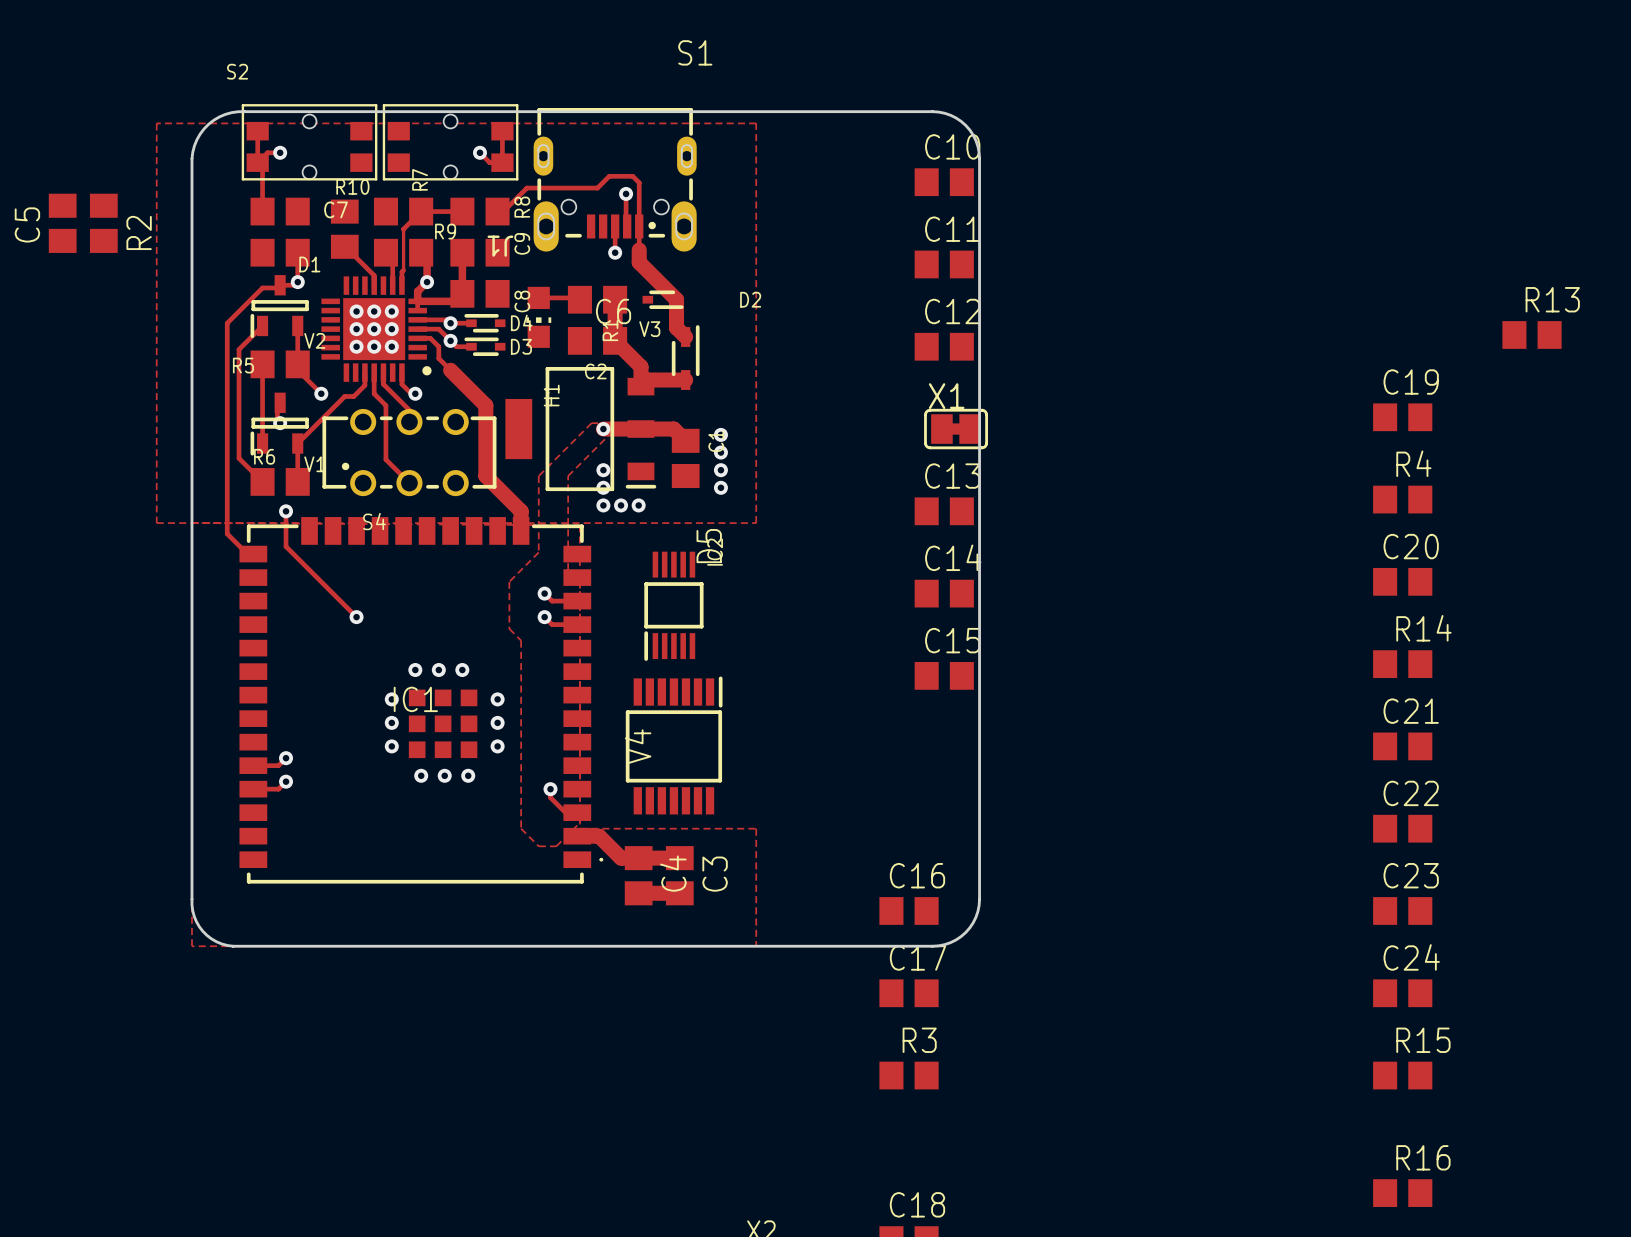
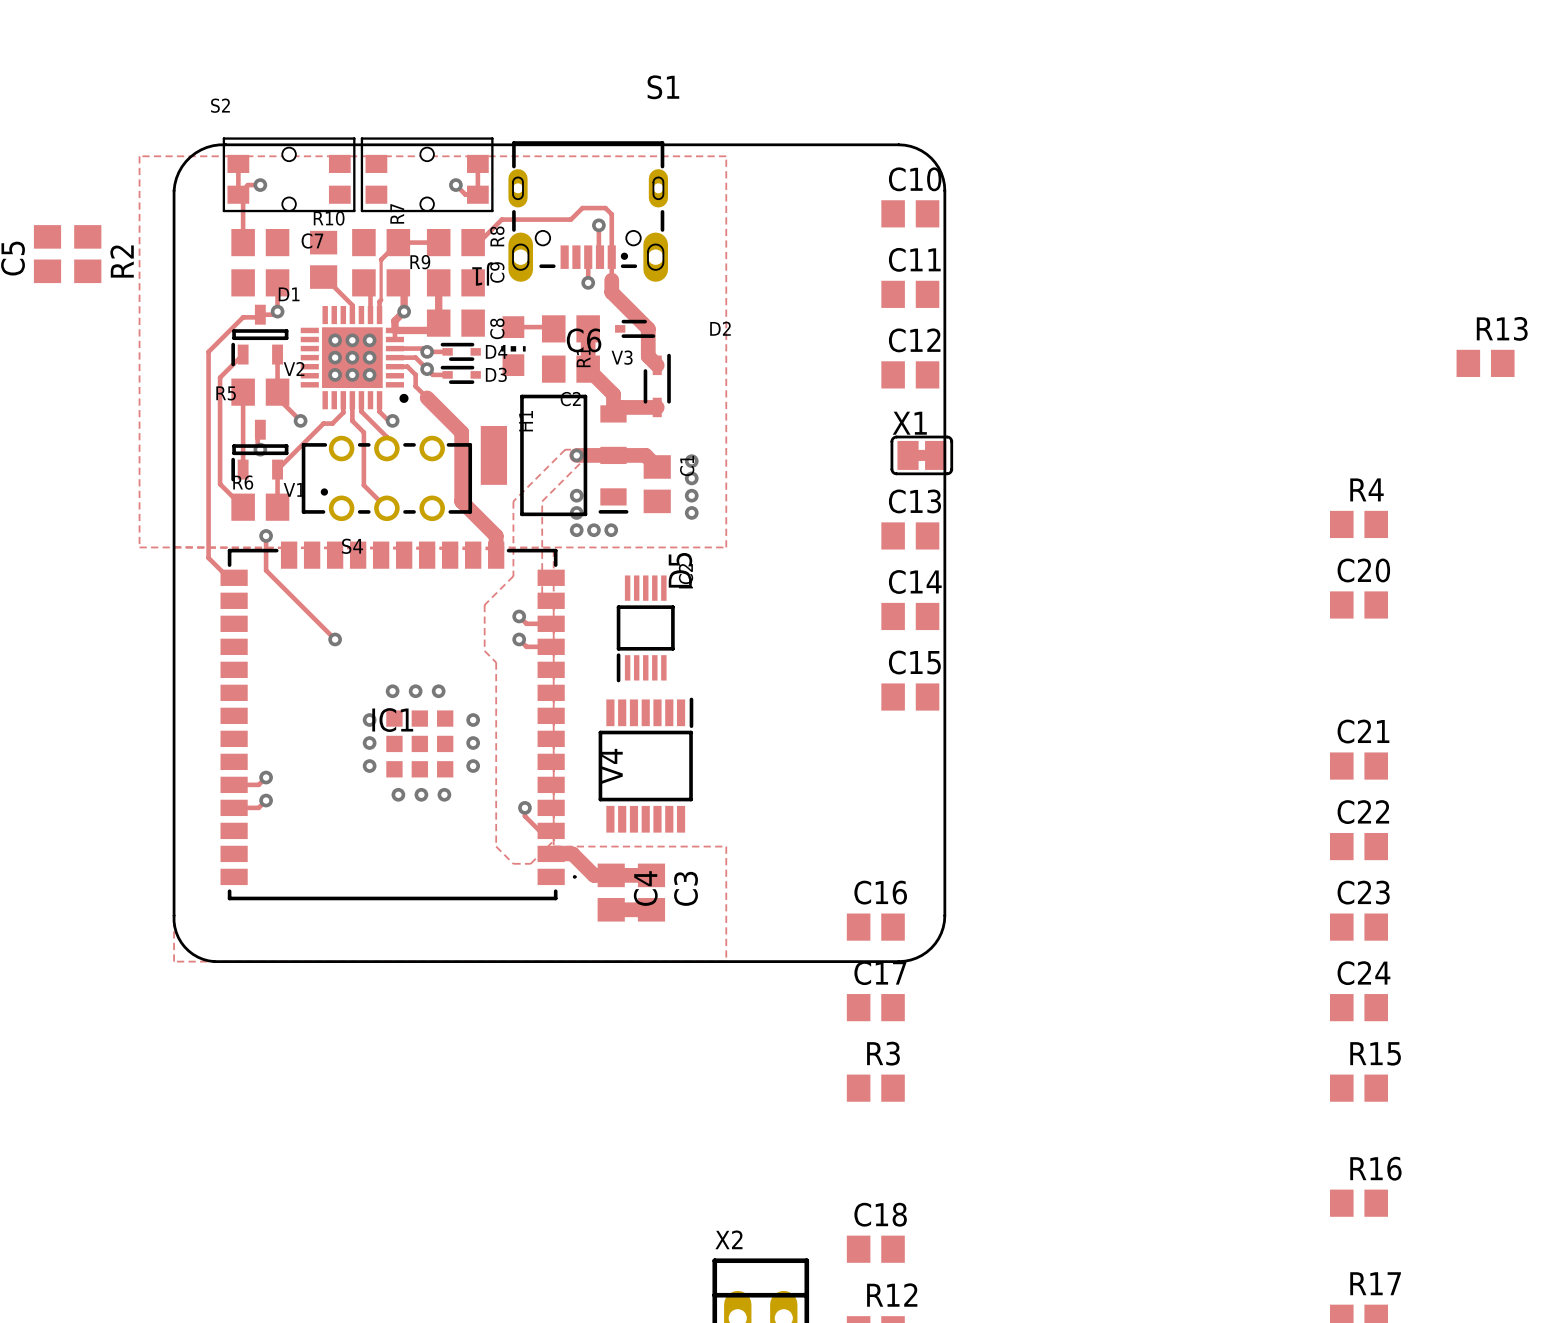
C19: (1402, 417) -> none
R14: (1402, 664) -> none

